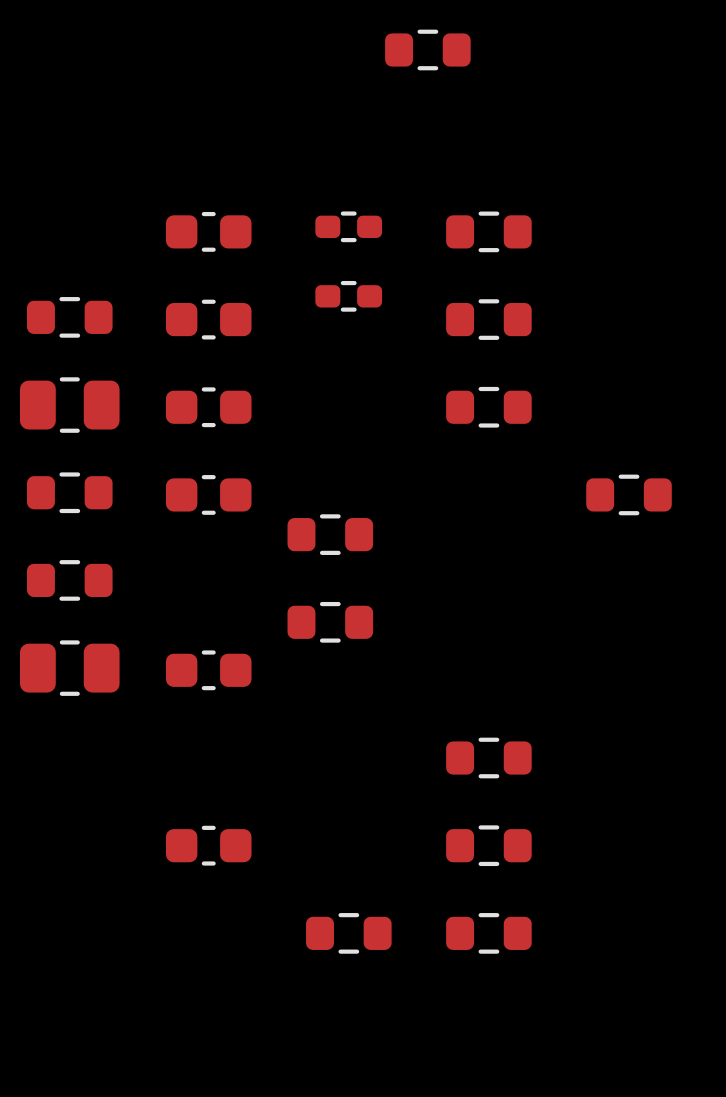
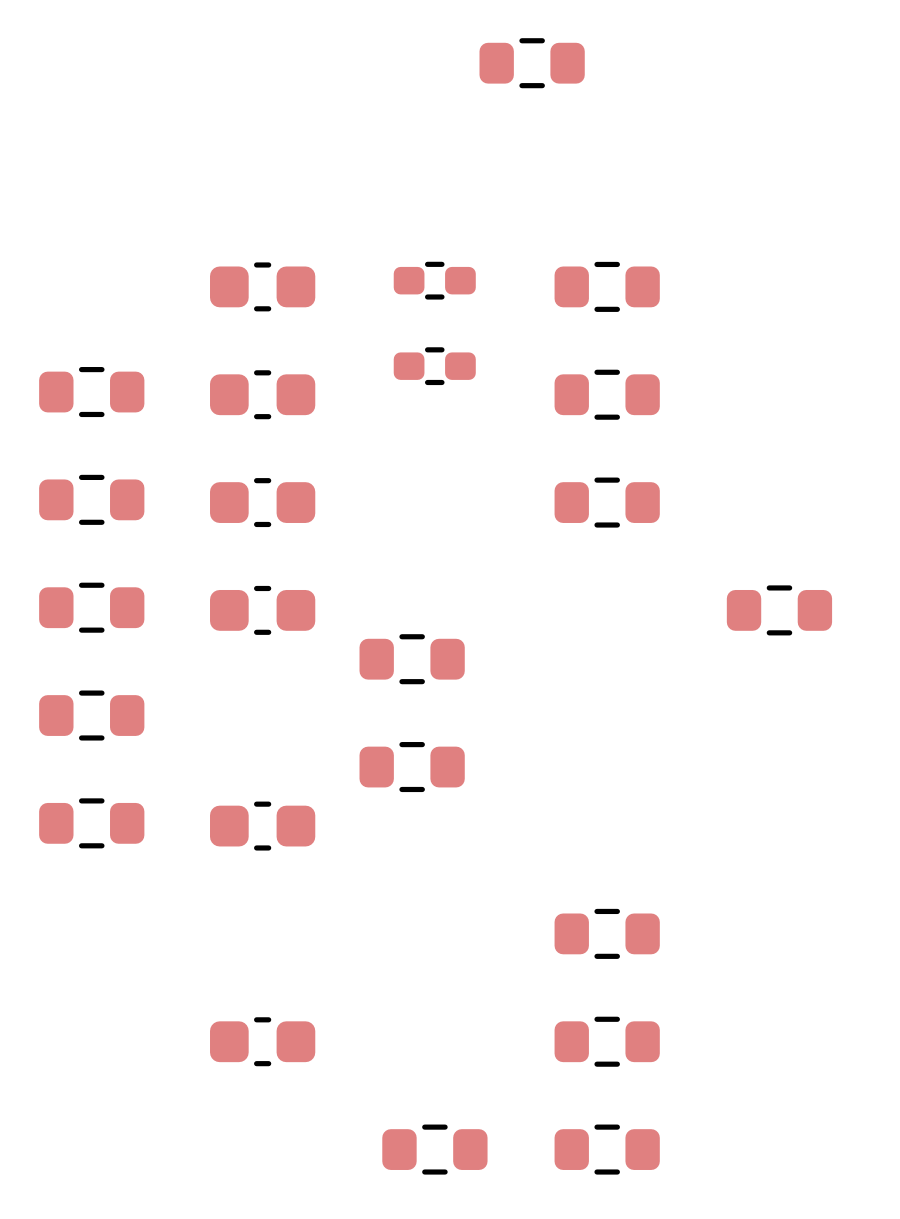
part footprint: [20, 377, 120, 433] -> [39, 474, 145, 525]
part footprint: [20, 640, 120, 696] -> [39, 798, 145, 849]

